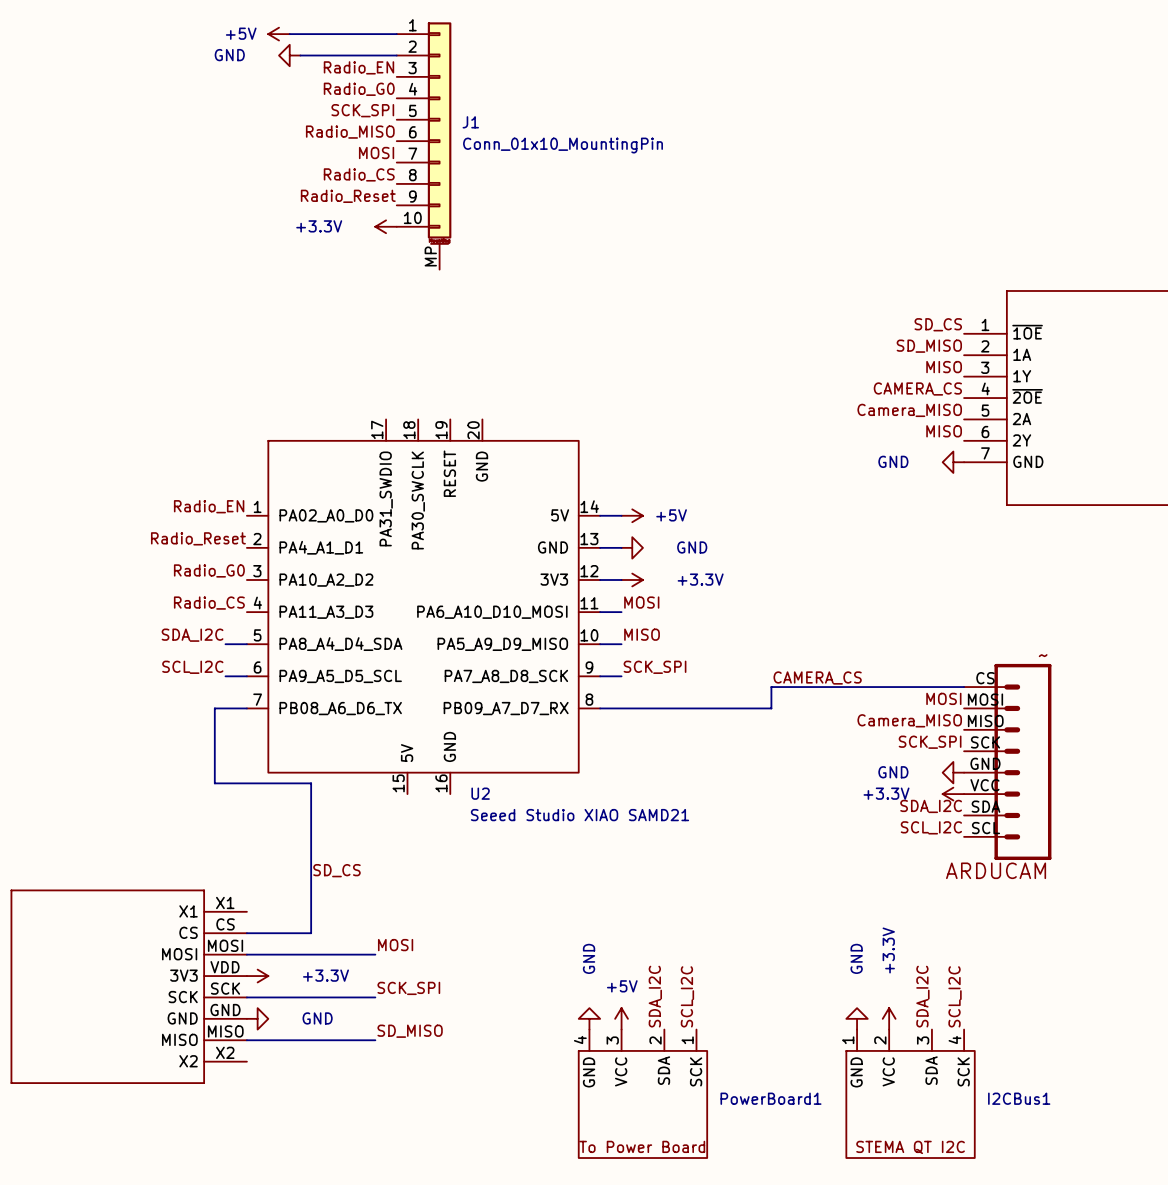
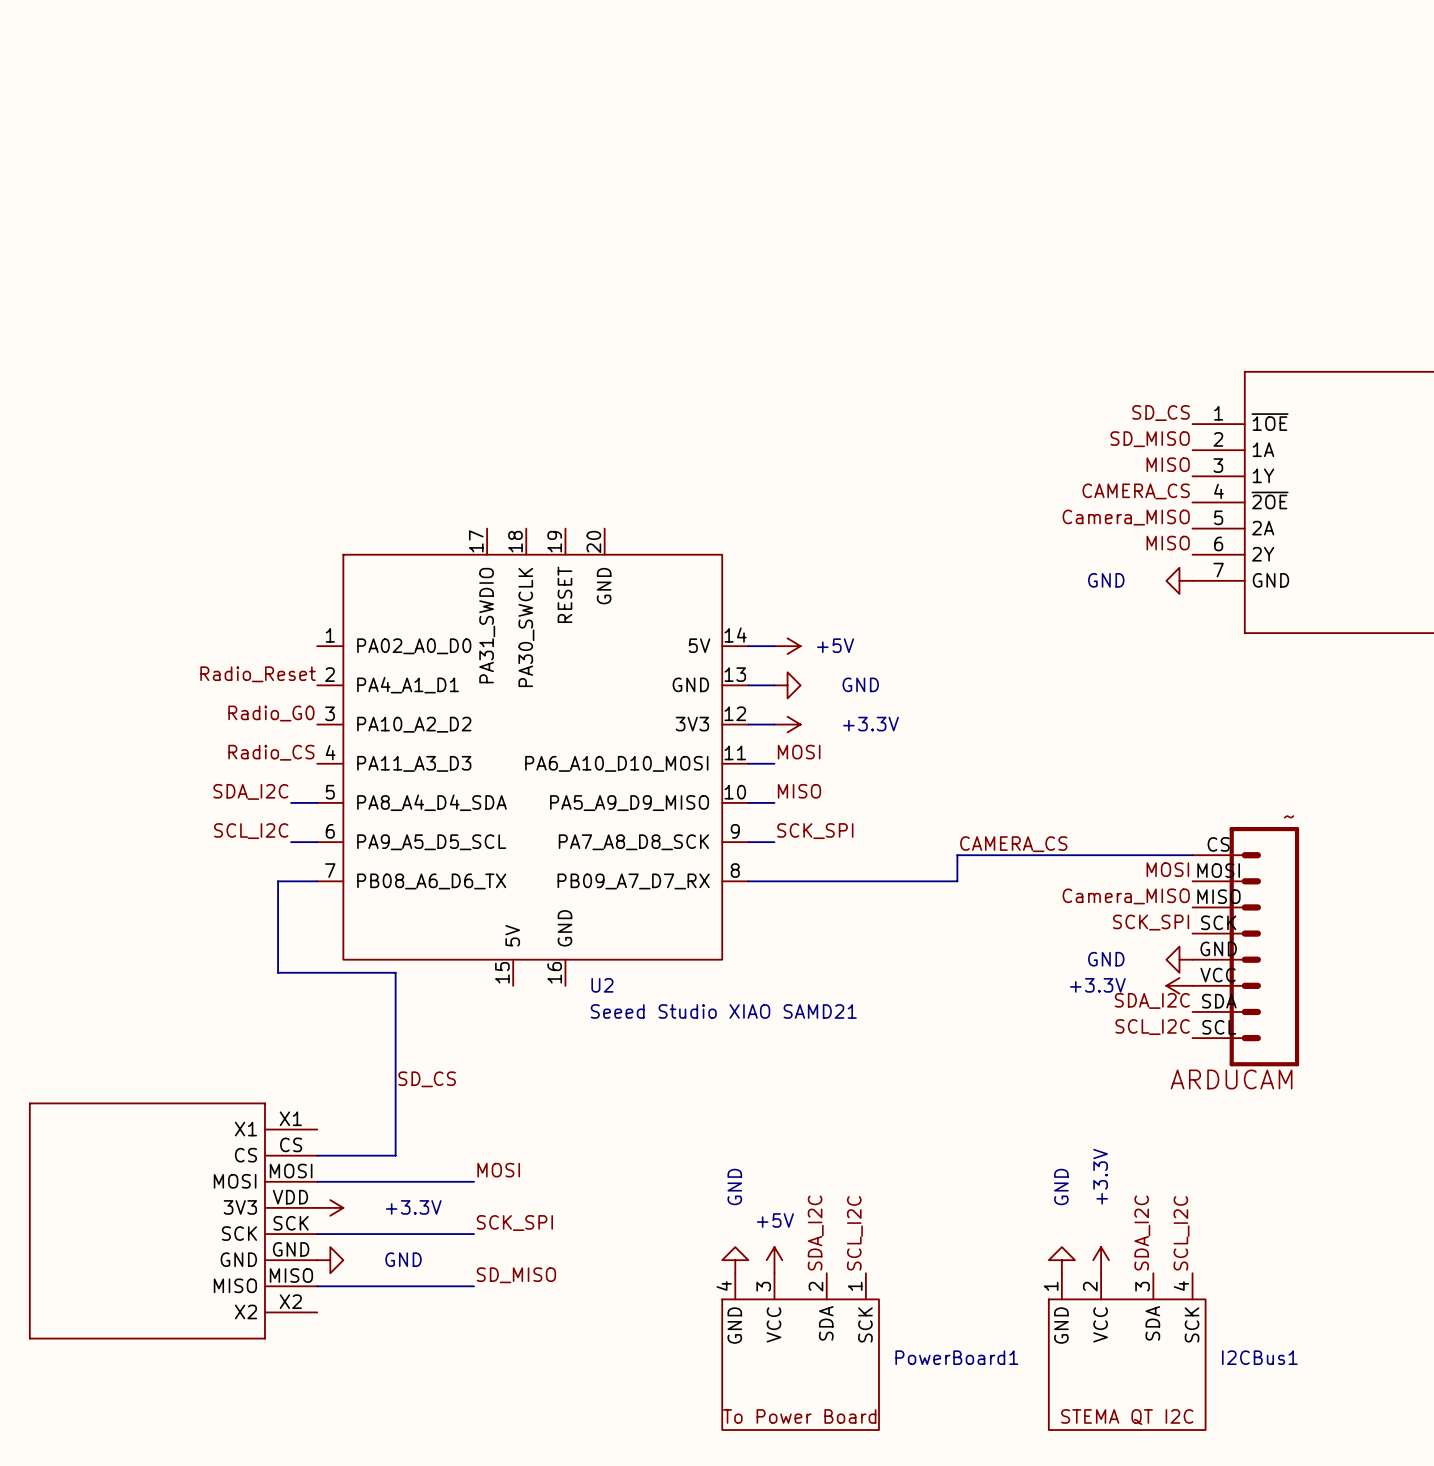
power symbol: +5V (279, 34) -> none
wire: (289, 34) (396, 34) -> none
power symbol: GND (289, 55) -> none
wire: (300, 55) (396, 55) -> none
label: Radio_EN (358, 67) -> none
label: Radio_G0 (359, 89) -> none
label: SCK_SPI (362, 110) -> none
label: Radio_MISO (350, 132) -> none
J1: Conn_01x10_MountingPin (424, 145) -> none
label: MOSI (376, 152) -> none
label: Radio_CS (359, 174) -> none
label: Radio_Reset (348, 196) -> none
power symbol: +3.3V (386, 226) -> none
label: Radio_EN (209, 506) -> none

